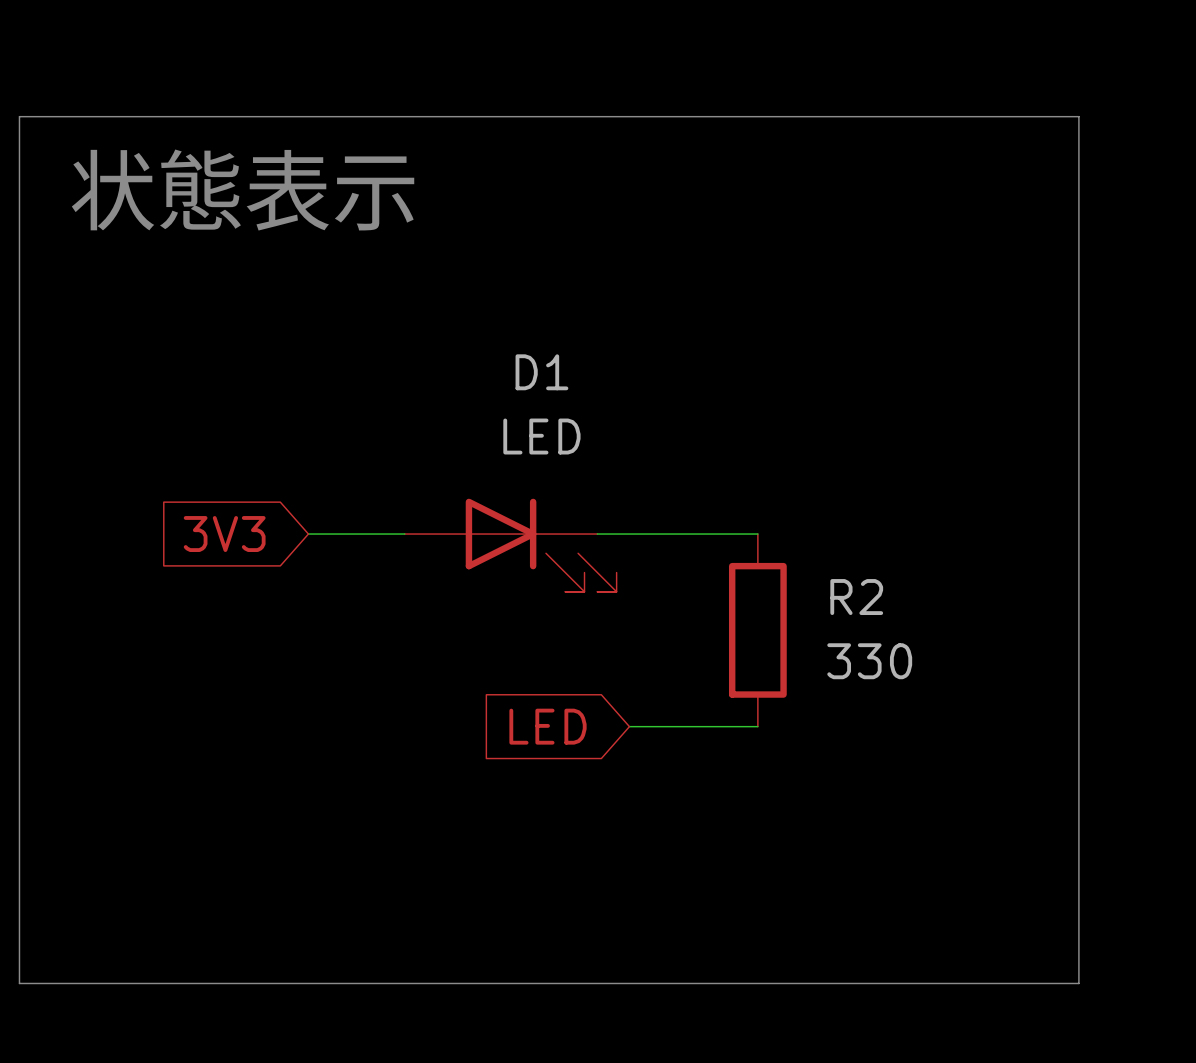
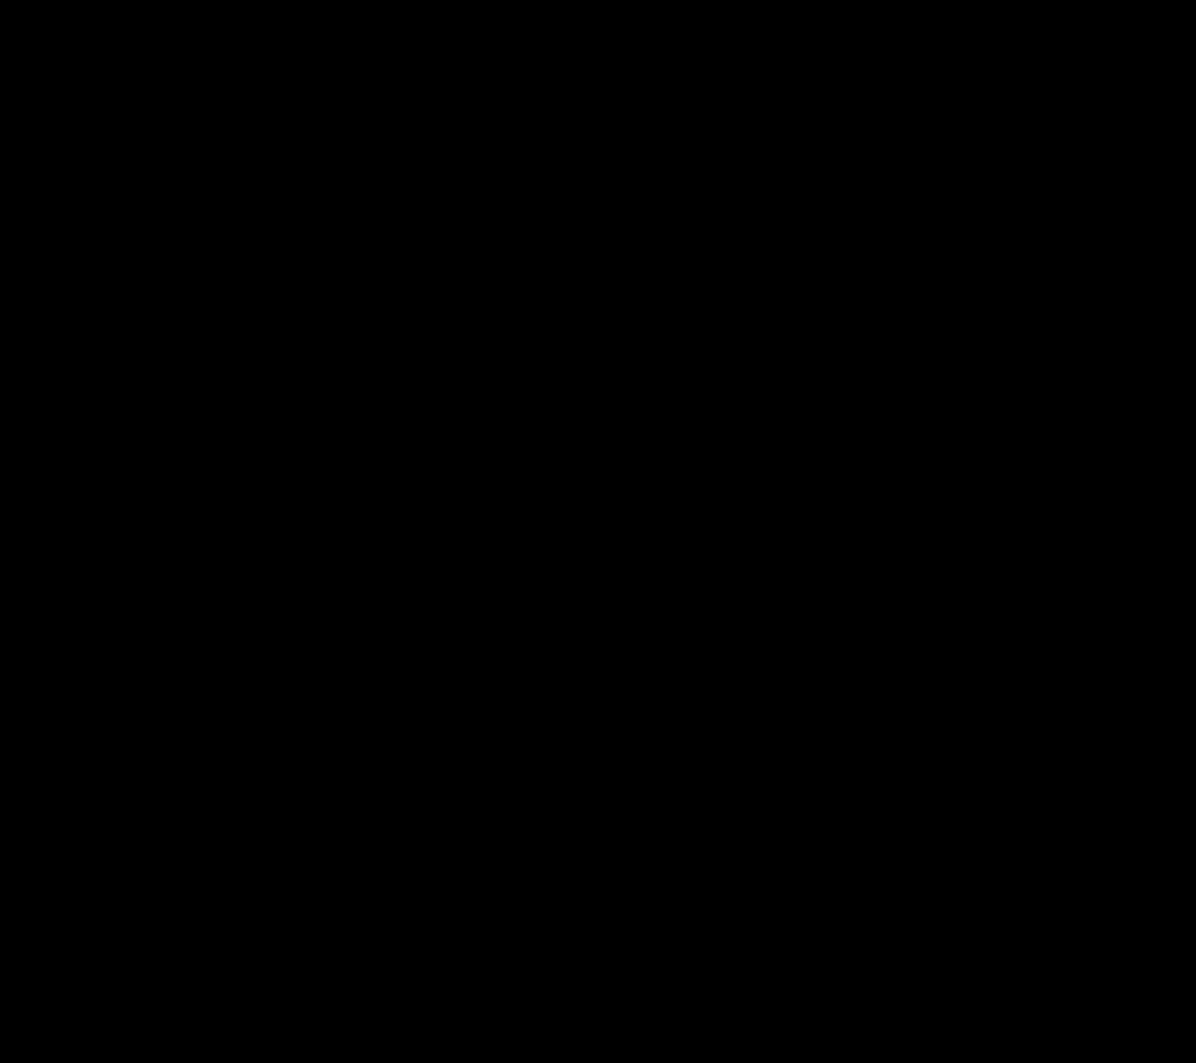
line: (19, 116) (1078, 116) (1078, 983) (19, 983) (19, 116) -> none
text: 状態表示 (243, 190) -> none
global label: 3V3 (224, 534) -> none
wire: (308, 534) (404, 534) -> none
wire: (597, 534) (757, 534) -> none
D1: LED (510, 545) -> none
R2: 330 (757, 630) -> none
global label: LED (548, 726) -> none
wire: (629, 726) (757, 726) -> none

